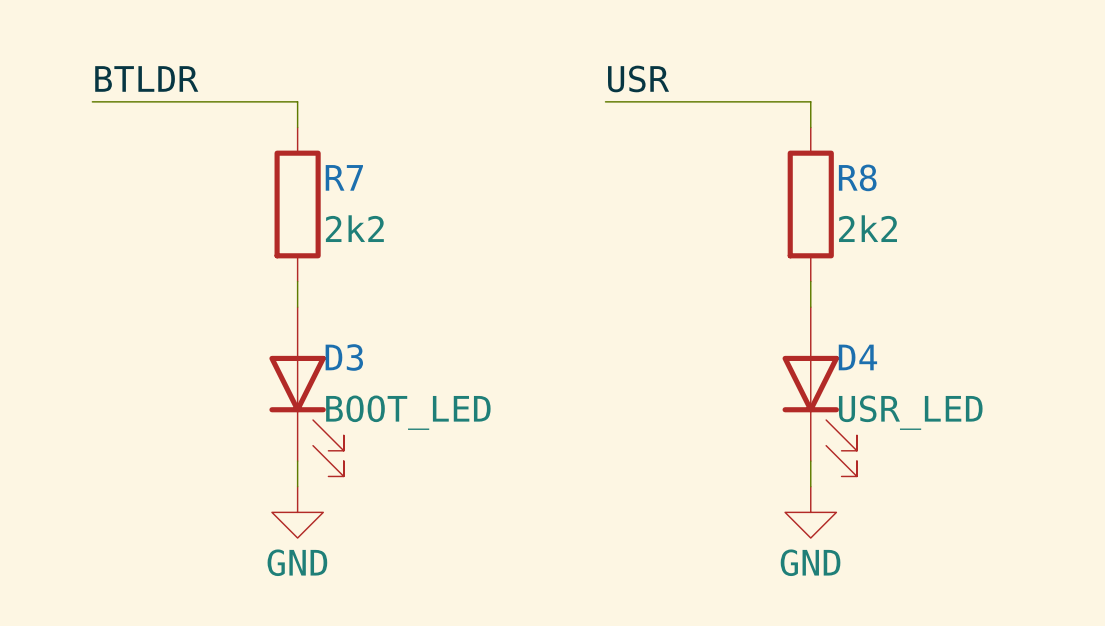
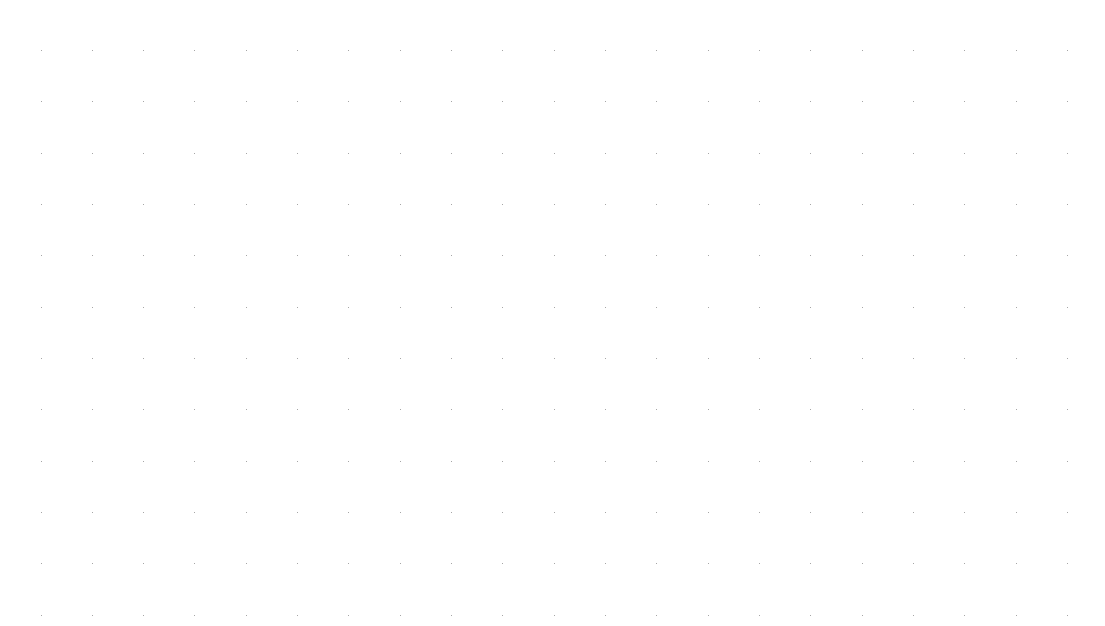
label: BTLDR (146, 78) -> none
label: USR (638, 78) -> none
wire: (92, 101) (297, 101) (297, 127) -> none
wire: (605, 101) (810, 101) (810, 127) -> none
R7: 2k2 (297, 204) -> none
R8: 2k2 (810, 204) -> none
wire: (297, 281) (297, 307) -> none
wire: (810, 281) (810, 307) -> none
D3: BOOT_LED (306, 391) -> none
D4: USR_LED (819, 391) -> none
wire: (297, 461) (297, 486) -> none
wire: (810, 461) (810, 486) -> none
power symbol: GND (297, 512) -> none
power symbol: GND (810, 512) -> none

